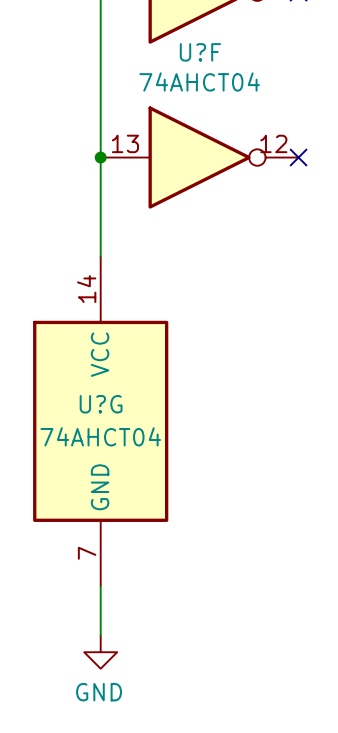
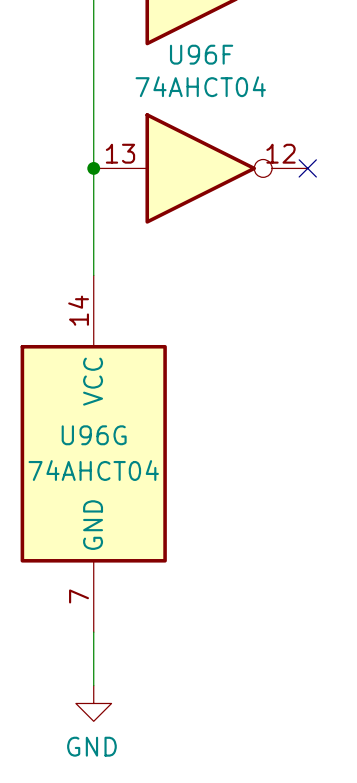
U?F name: U?F (200, 52) -> U96F (201, 54)
U?G name: U?G (101, 404) -> U96G (94, 435)

